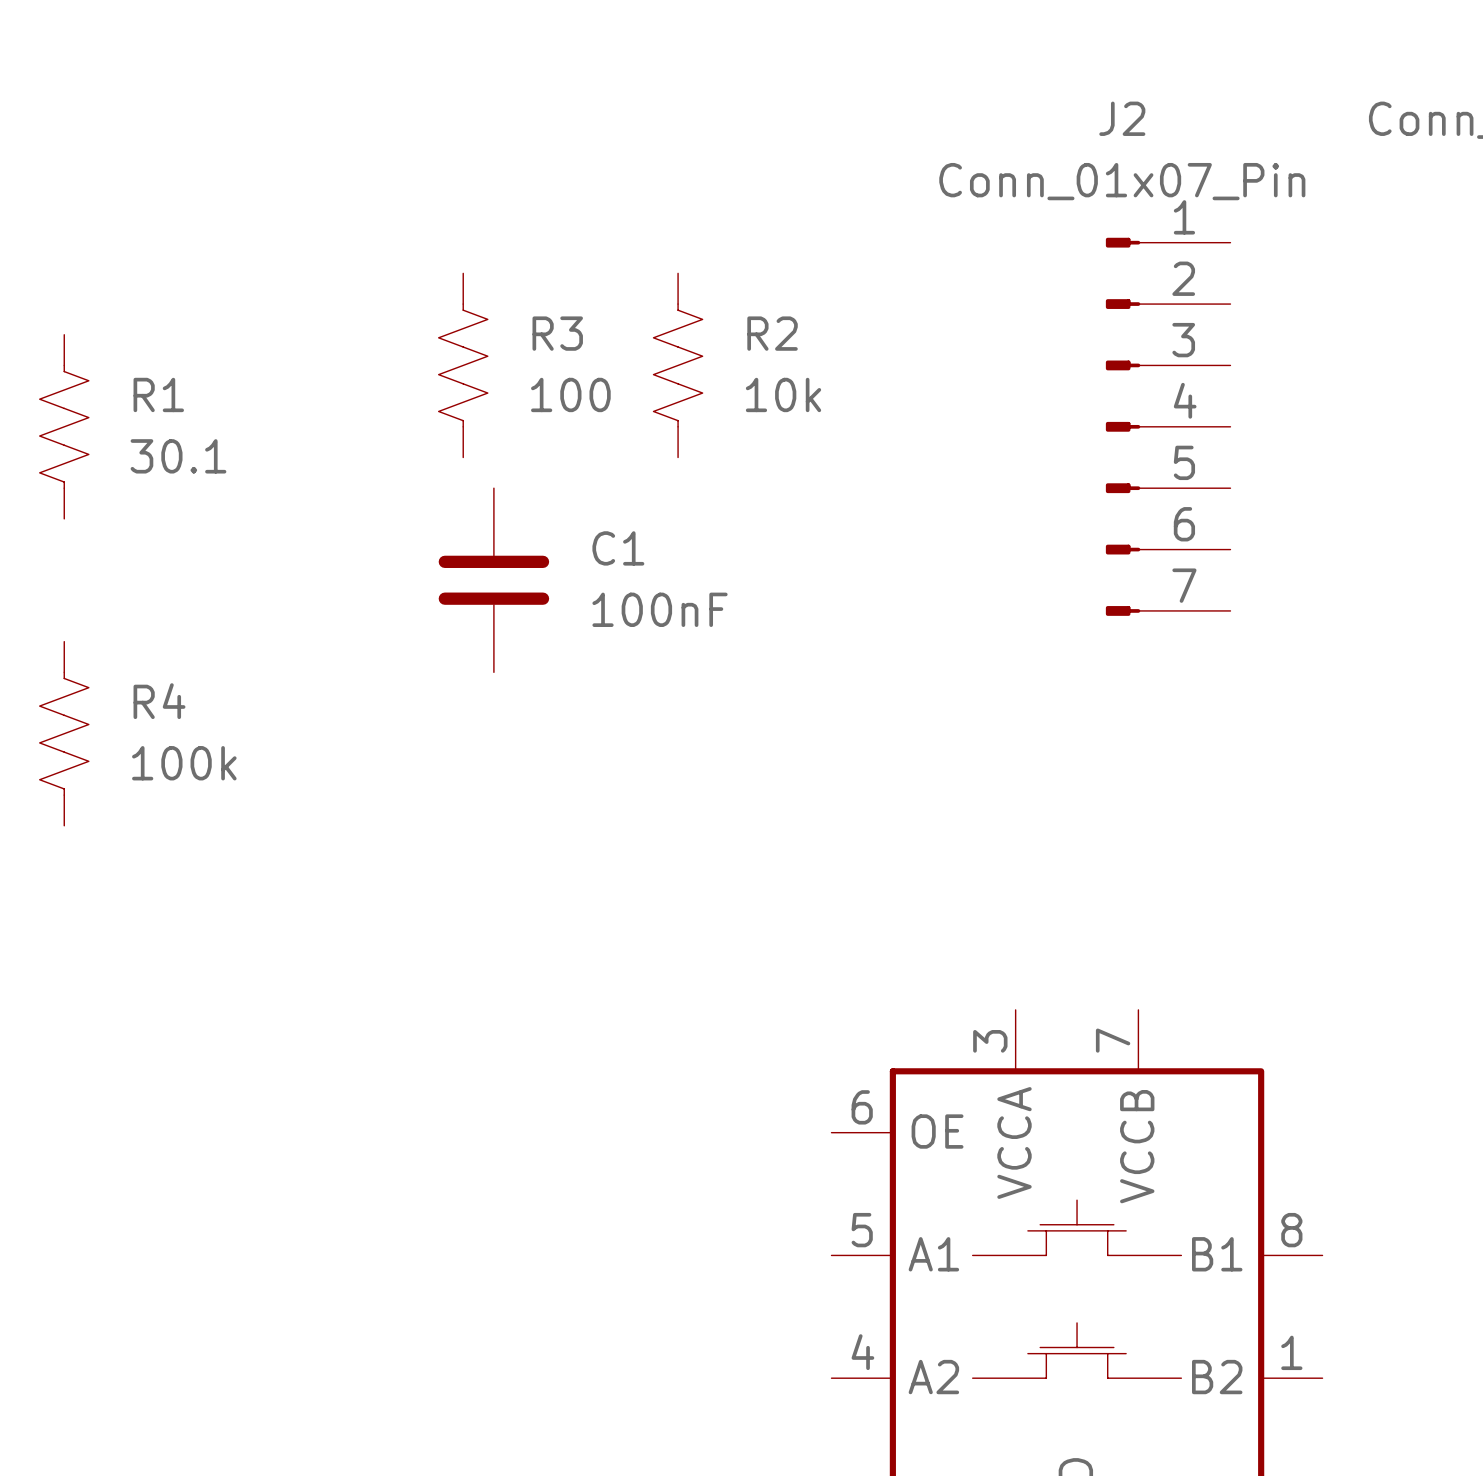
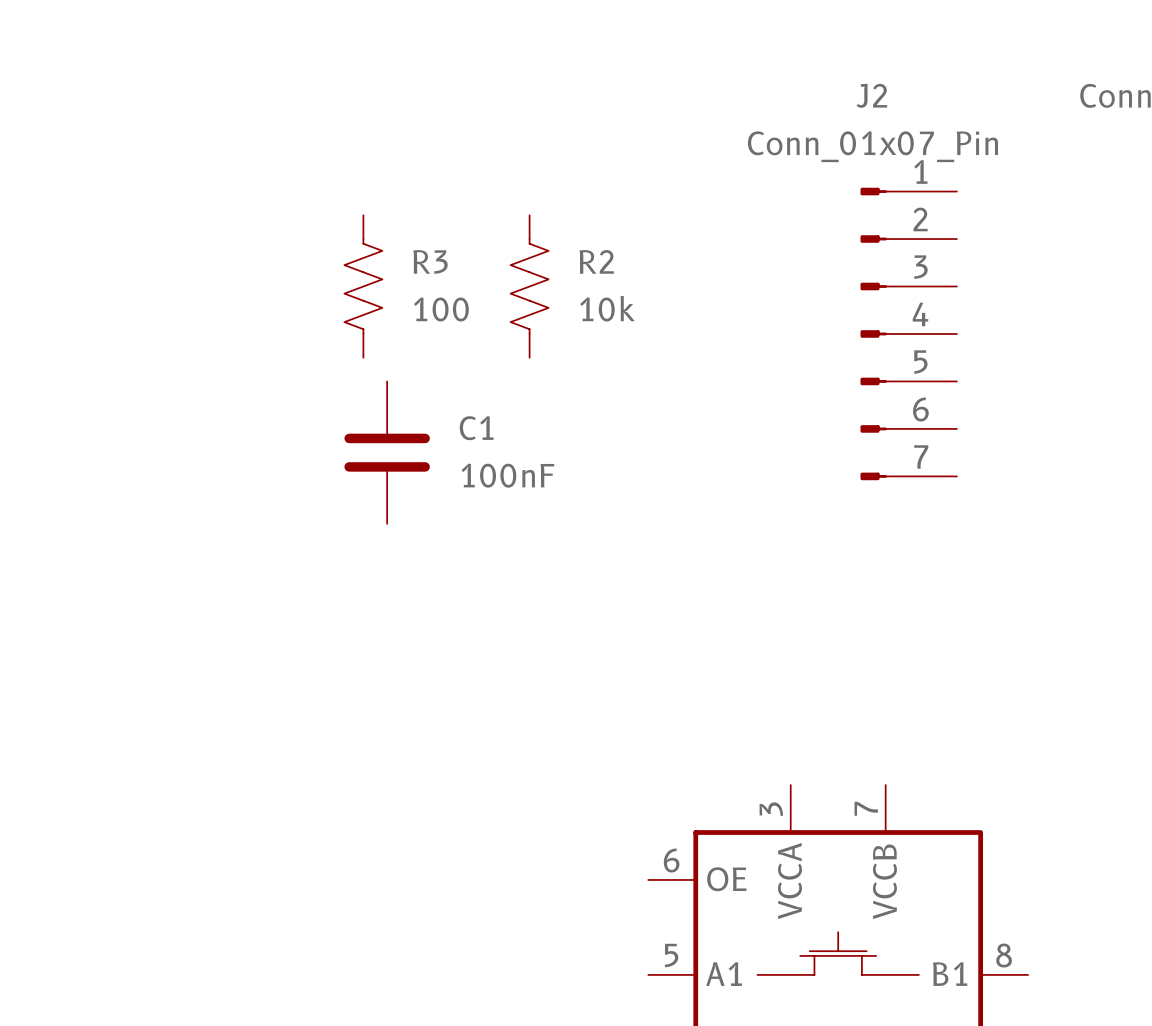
R1: 30.1 (64, 426) -> none
R4: 100k (64, 733) -> none

